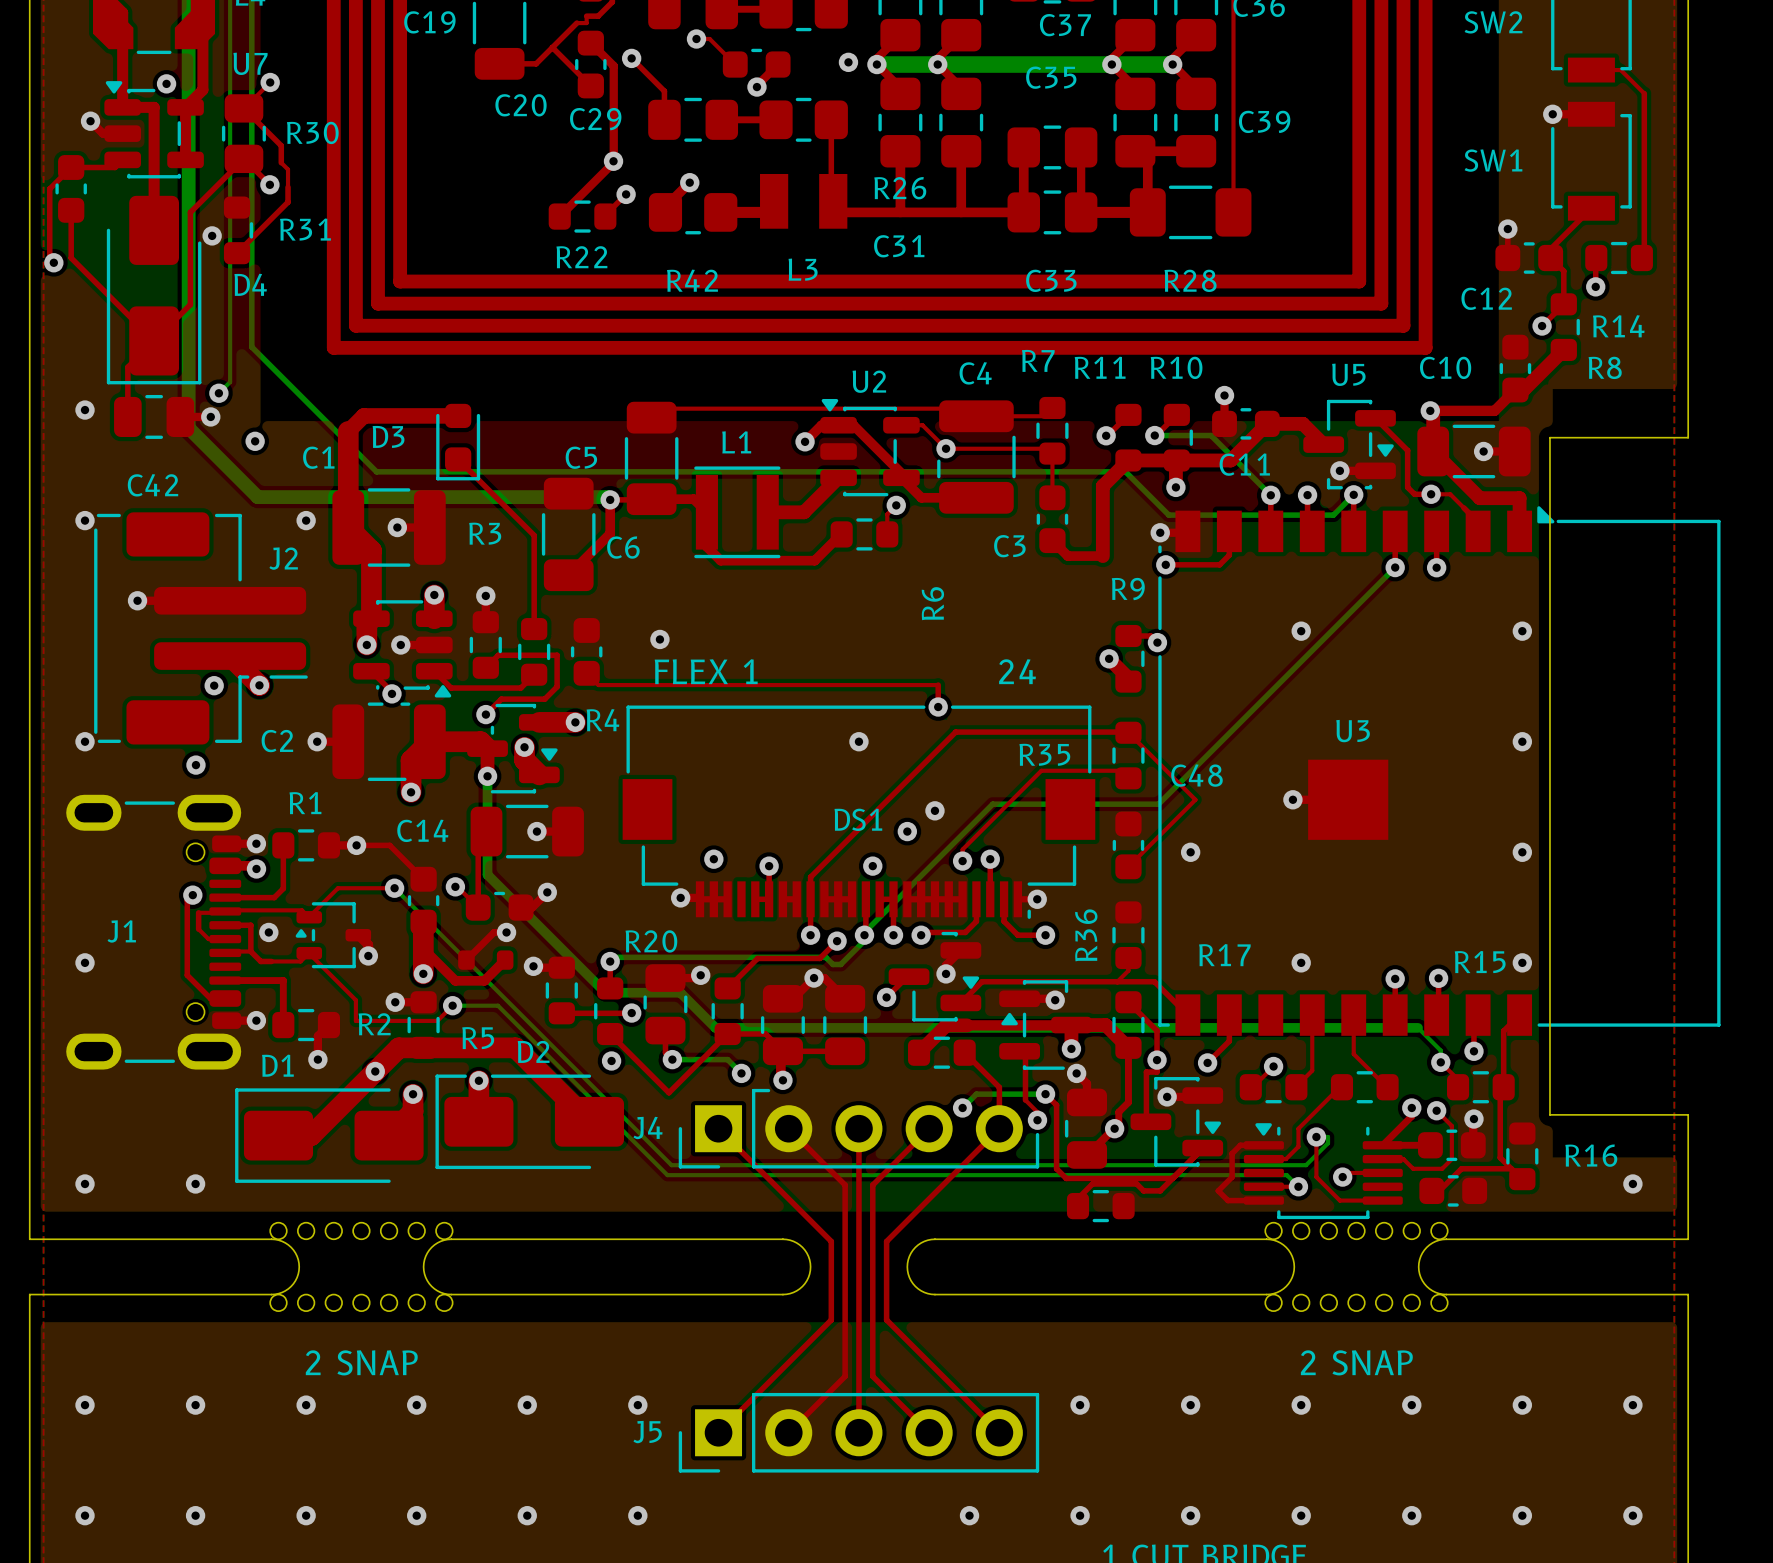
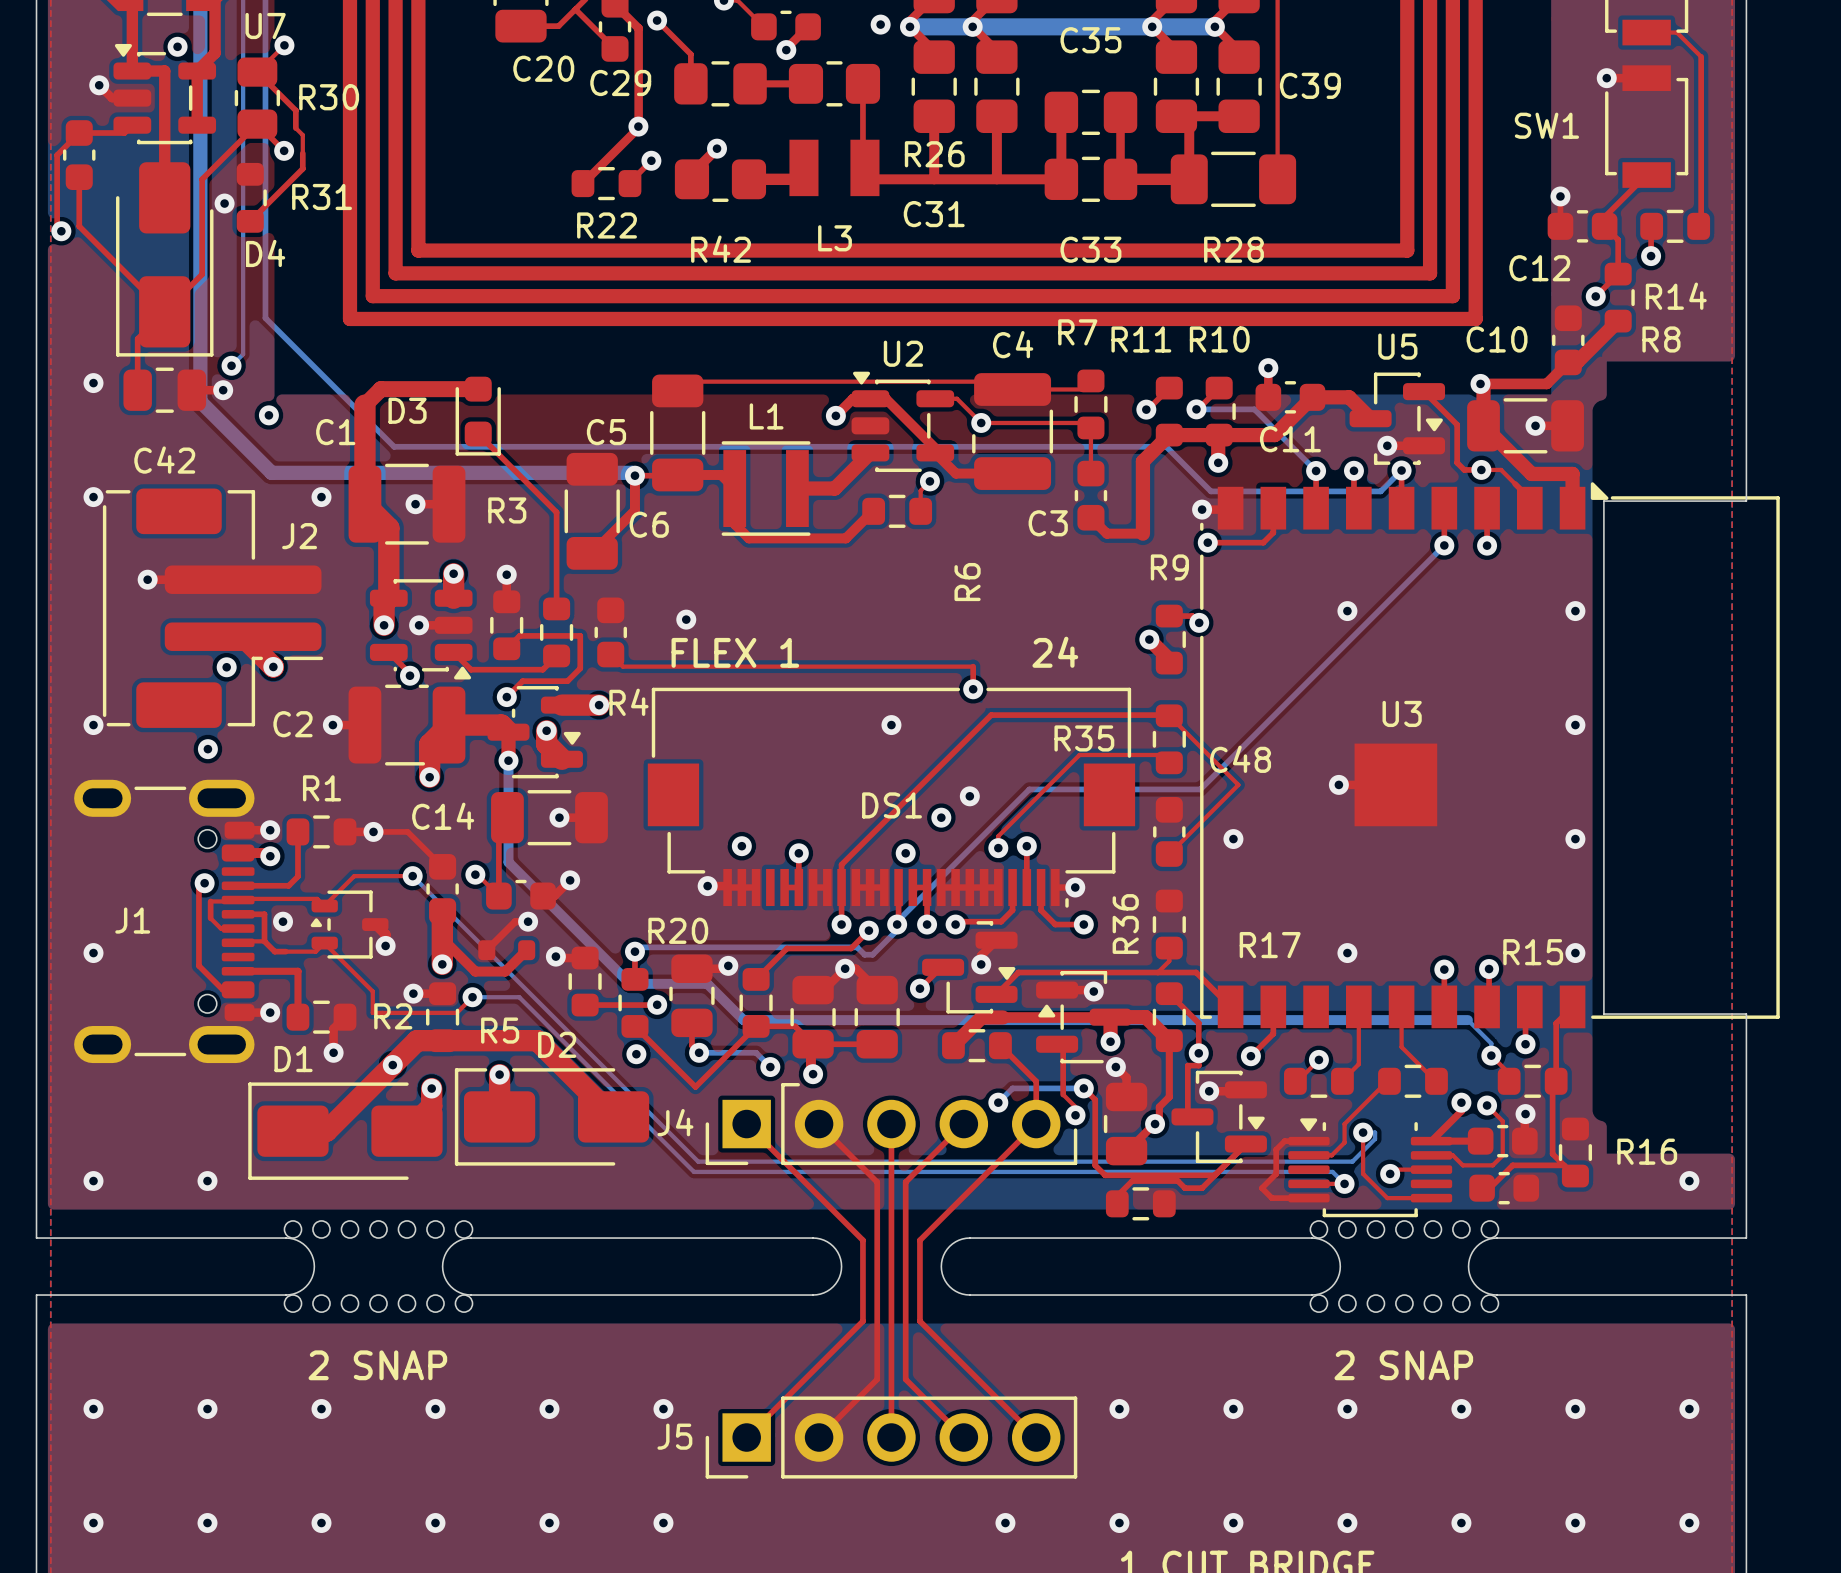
board edge: (1688, 437) (1549, 437) (1549, 524) -> (1746, 411) (1746, 501) (1603, 501)
board edge: (1549, 1022) (1549, 1114) (1688, 1114) -> (1603, 1014) (1746, 1014) (1746, 1109)

